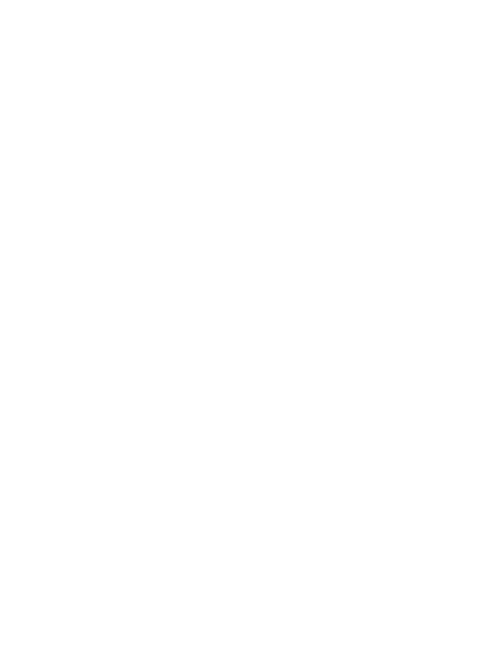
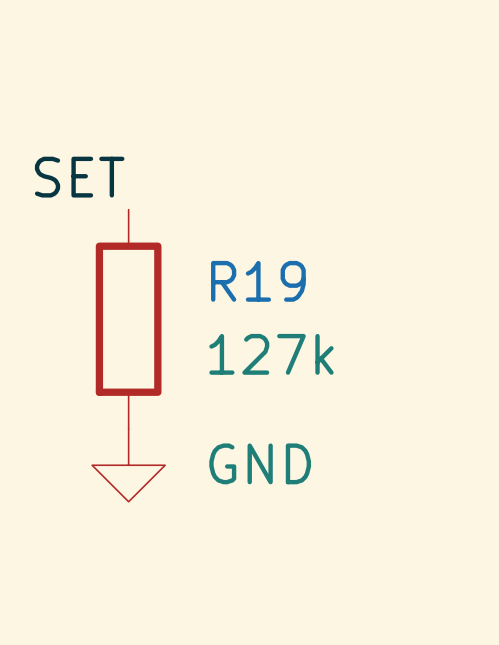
label: none -> SET (79, 177)
R19: none -> 127k (128, 319)
power symbol: none -> GND (128, 465)

